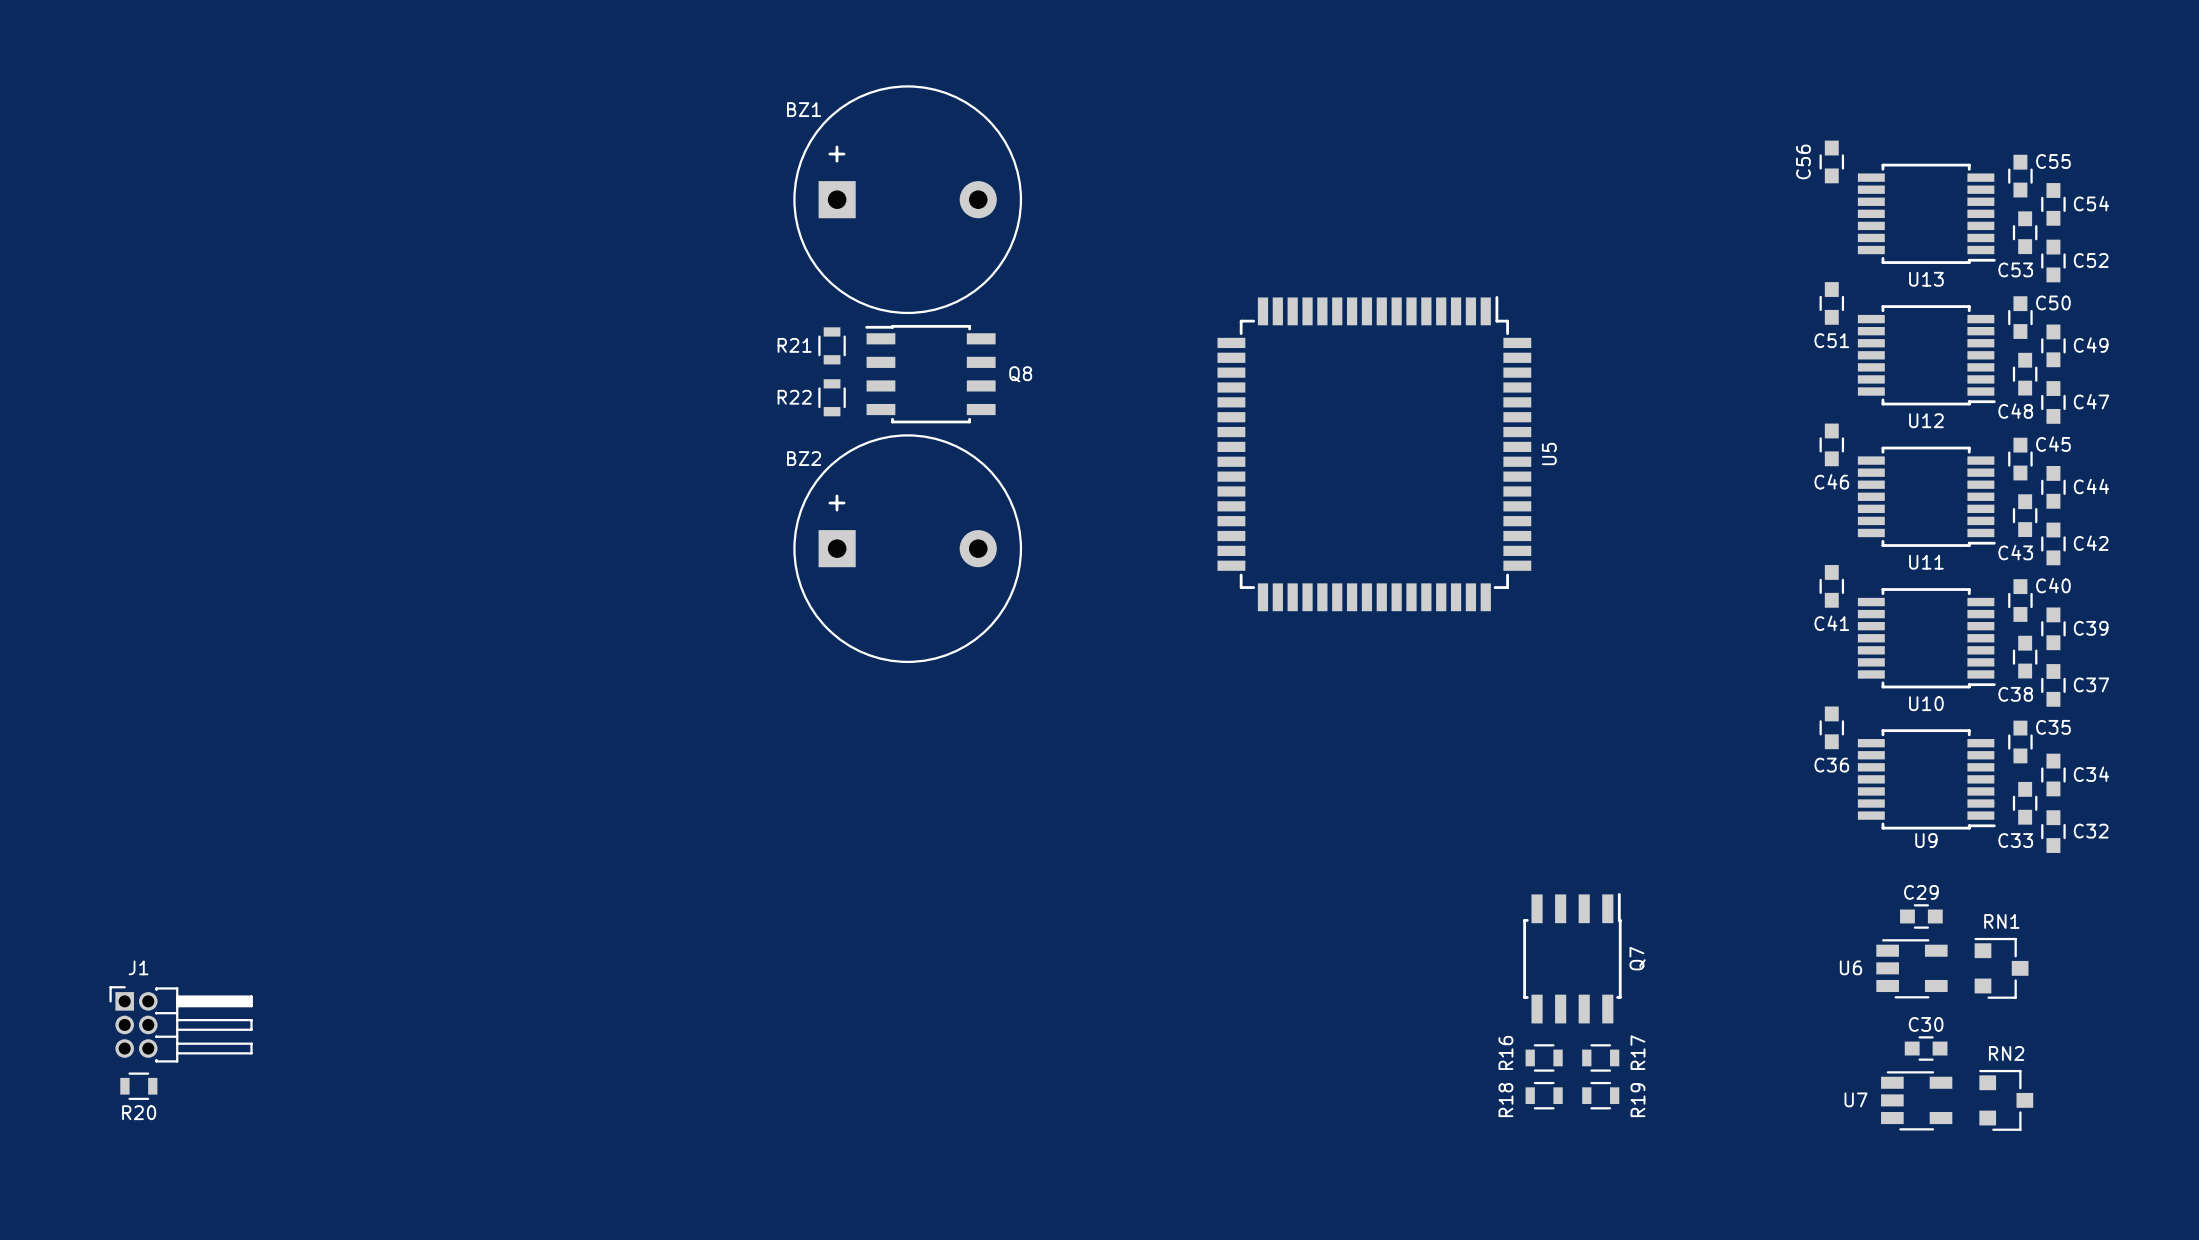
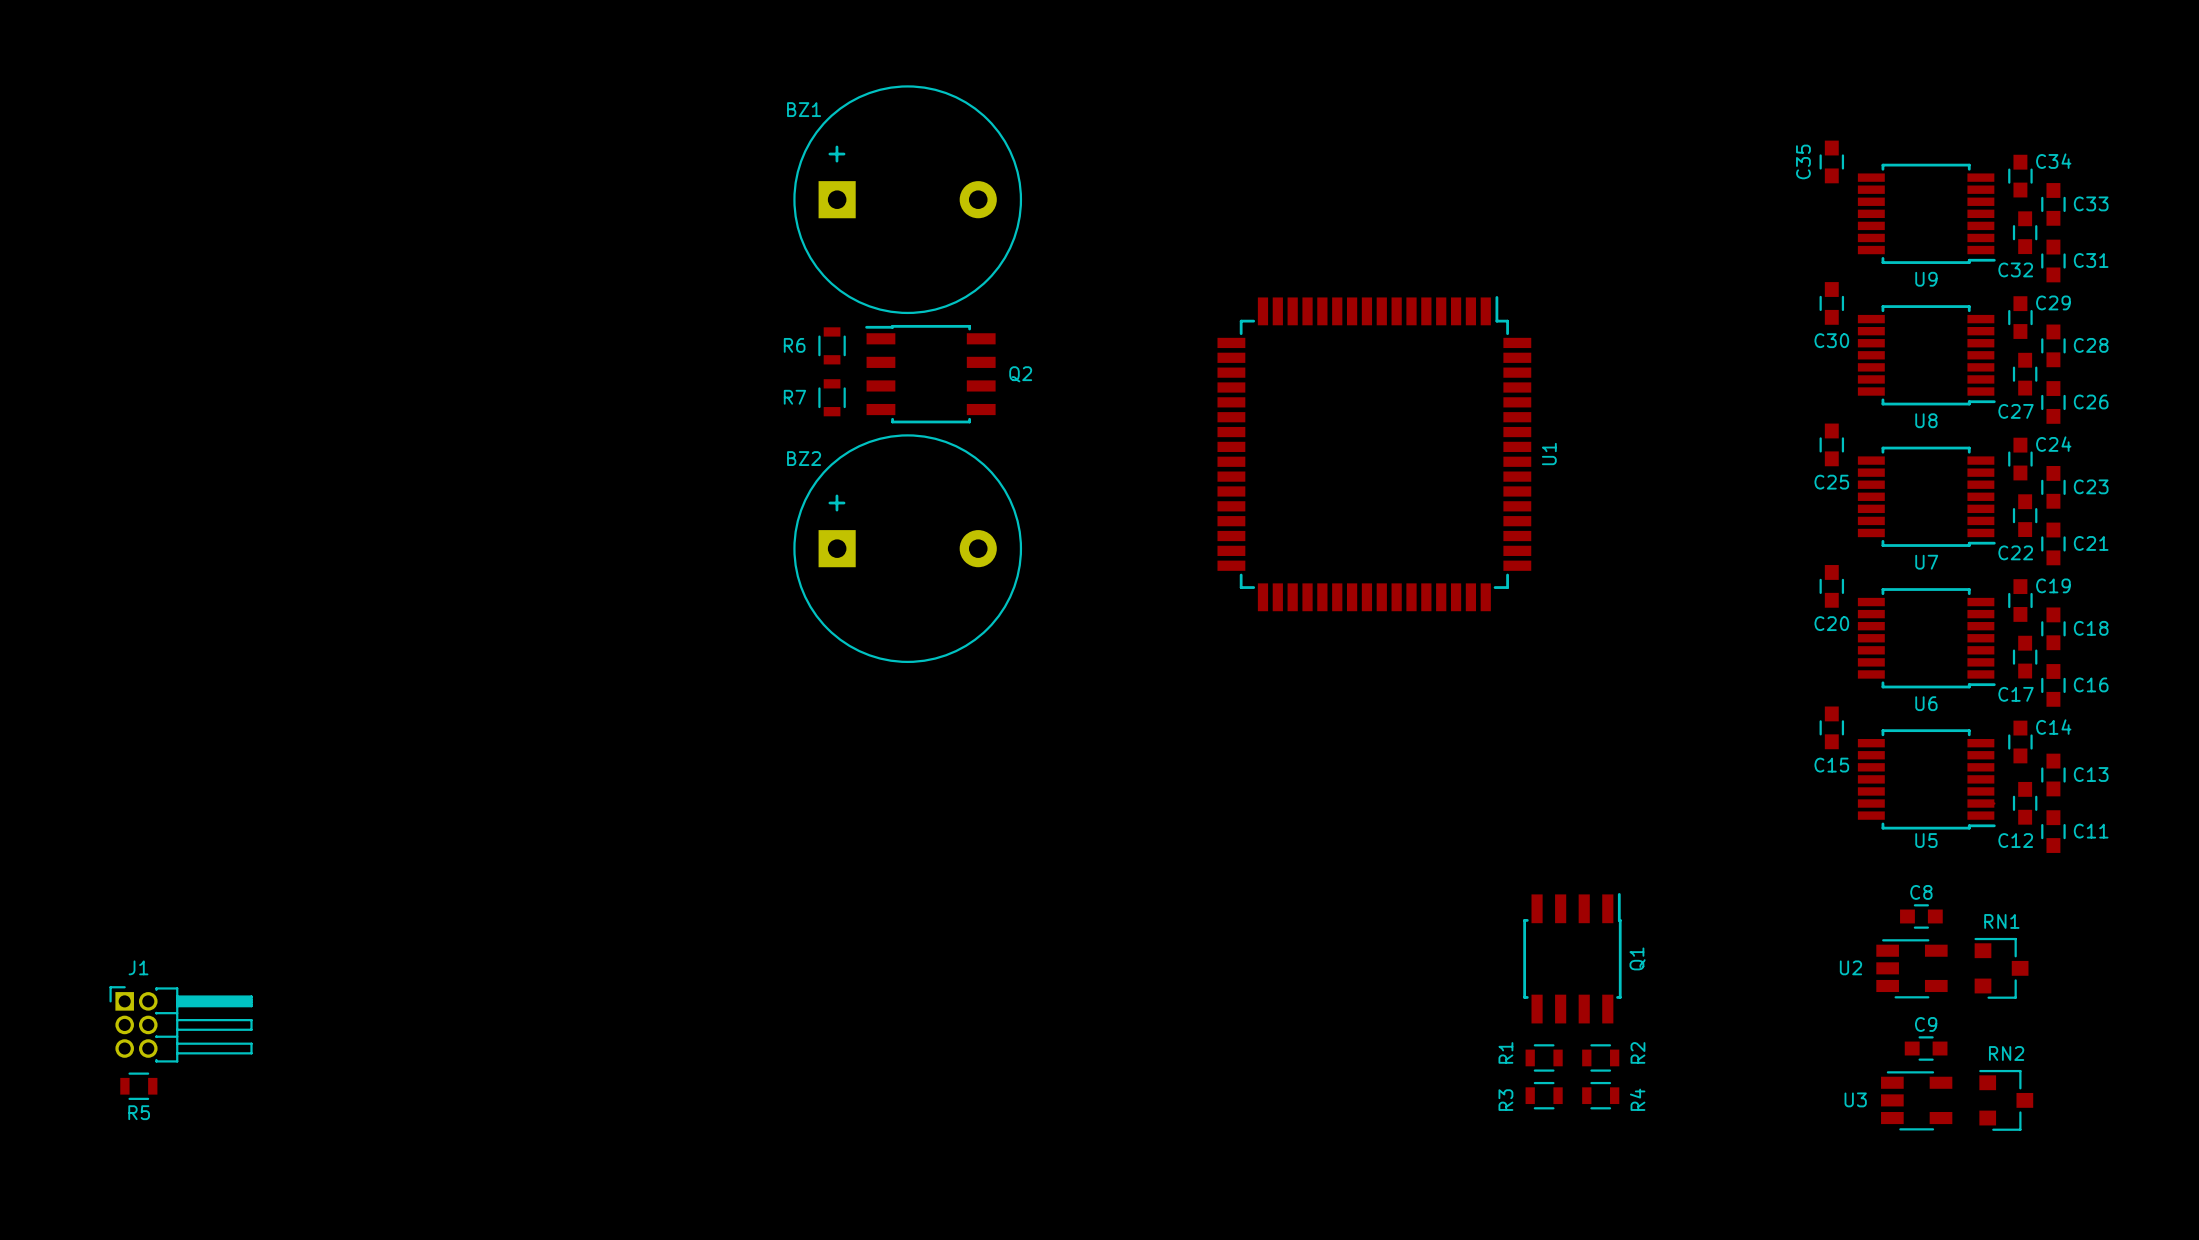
C56 name: C56 (1803, 161) -> C35 (1803, 161)
C55 name: C55 (2053, 161) -> C34 (2053, 161)
C54 name: C54 (2091, 203) -> C33 (2091, 203)
C52 name: C52 (2091, 260) -> C31 (2091, 260)
C53 name: C53 (2015, 269) -> C32 (2015, 269)
U13 name: U13 (1926, 279) -> U9 (1926, 279)
C50 name: C50 (2053, 302) -> C29 (2053, 302)
C51 name: C51 (1831, 340) -> C30 (1831, 340)
R21 name: R21 (794, 345) -> R6 (794, 345)
C49 name: C49 (2091, 345) -> C28 (2091, 345)
Q8 name: Q8 (1020, 374) -> Q2 (1020, 374)
R22 name: R22 (794, 397) -> R7 (794, 397)
C47 name: C47 (2091, 401) -> C26 (2091, 401)
C48 name: C48 (2015, 411) -> C27 (2016, 411)
U12 name: U12 (1926, 420) -> U8 (1926, 420)
C45 name: C45 (2053, 444) -> C24 (2053, 444)
U5 name: U5 (1549, 454) -> U1 (1549, 454)
C46 name: C46 (1831, 481) -> C25 (1831, 482)
C44 name: C44 (2091, 486) -> C23 (2091, 486)
C42 name: C42 (2091, 543) -> C21 (2091, 543)
C43 name: C43 (2015, 552) -> C22 (2015, 552)
U11 name: U11 (1926, 562) -> U7 (1926, 562)
C40 name: C40 (2053, 585) -> C19 (2053, 585)
C41 name: C41 (1831, 623) -> C20 (1831, 623)
C39 name: C39 (2091, 628) -> C18 (2091, 628)
C37 name: C37 (2091, 684) -> C16 (2091, 684)
C38 name: C38 (2015, 694) -> C17 (2016, 694)
U10 name: U10 (1926, 703) -> U6 (1926, 703)
C35 name: C35 (2053, 727) -> C14 (2053, 727)
C36 name: C36 (1831, 765) -> C15 (1831, 765)
C34 name: C34 (2091, 774) -> C13 (2091, 774)
C32 name: C32 (2091, 831) -> C11 (2091, 831)
U9 name: U9 (1926, 840) -> U5 (1926, 840)
C33 name: C33 (2015, 840) -> C12 (2015, 840)
C29 name: C29 (1921, 892) -> C8 (1921, 892)
Q7 name: Q7 (1637, 958) -> Q1 (1637, 958)
U6 name: U6 (1850, 967) -> U2 (1850, 967)
C30 name: C30 (1926, 1024) -> C9 (1926, 1024)
R16 name: R16 (1505, 1052) -> R1 (1505, 1052)
R17 name: R17 (1637, 1052) -> R2 (1637, 1052)
U7 name: U7 (1855, 1099) -> U3 (1855, 1099)
R18 name: R18 (1505, 1100) -> R3 (1505, 1100)
R19 name: R19 (1637, 1100) -> R4 (1637, 1099)
R20 name: R20 (139, 1112) -> R5 (139, 1112)

